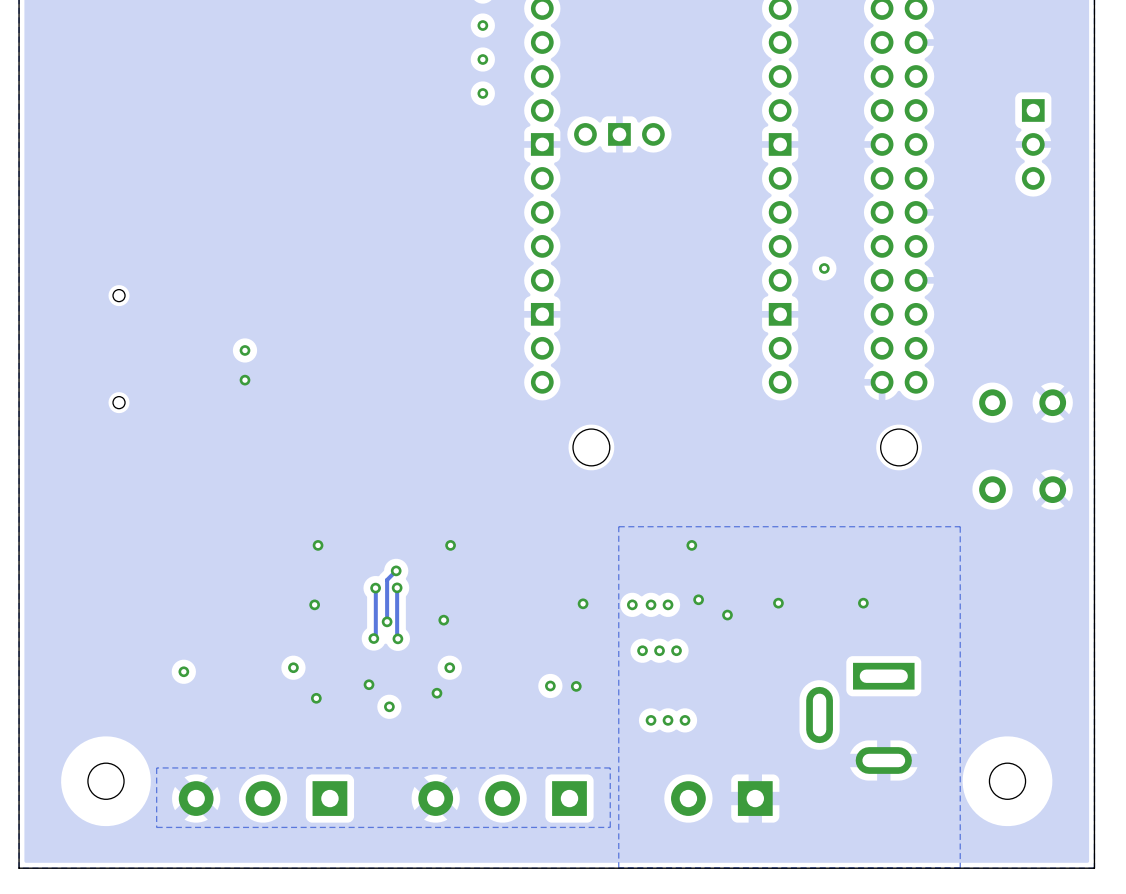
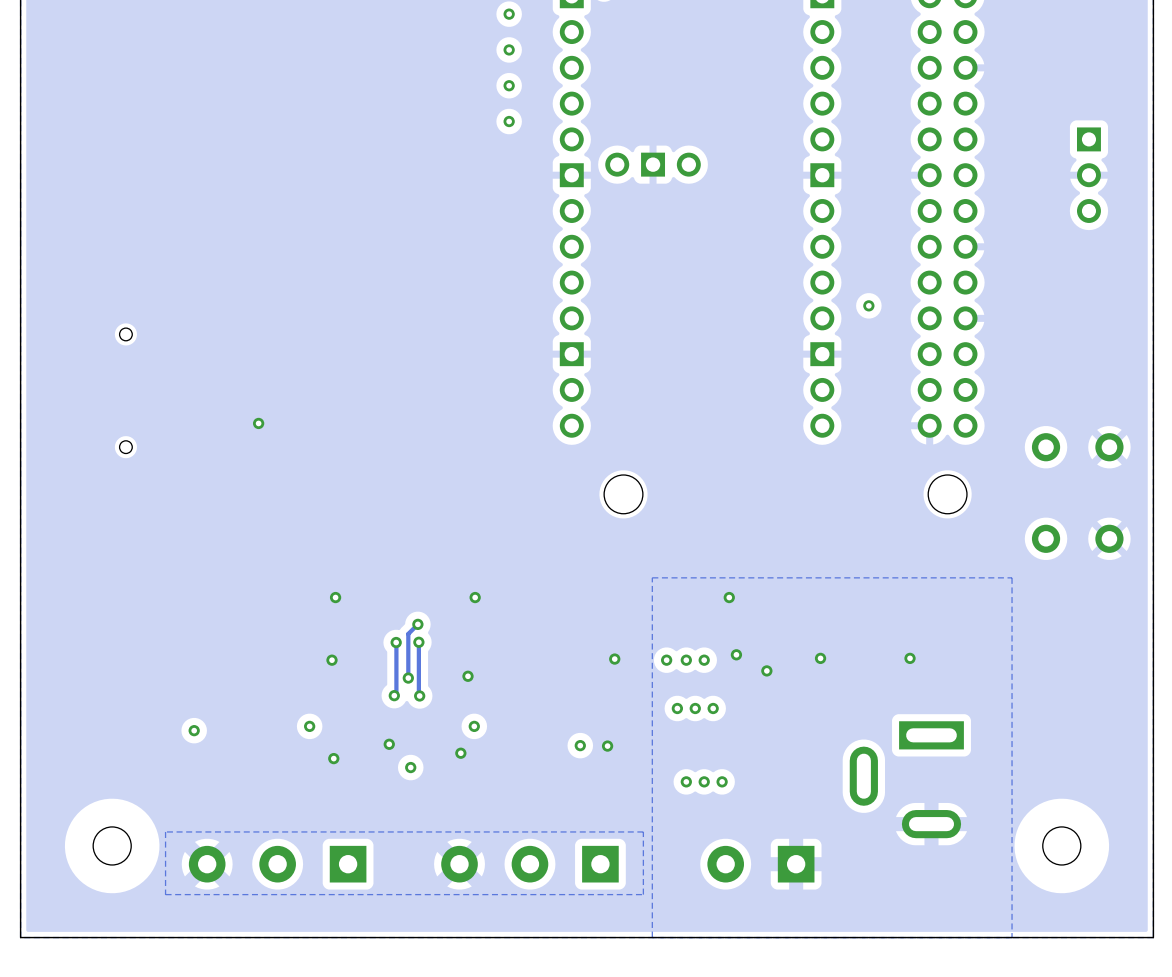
via: (244, 350) -> none

